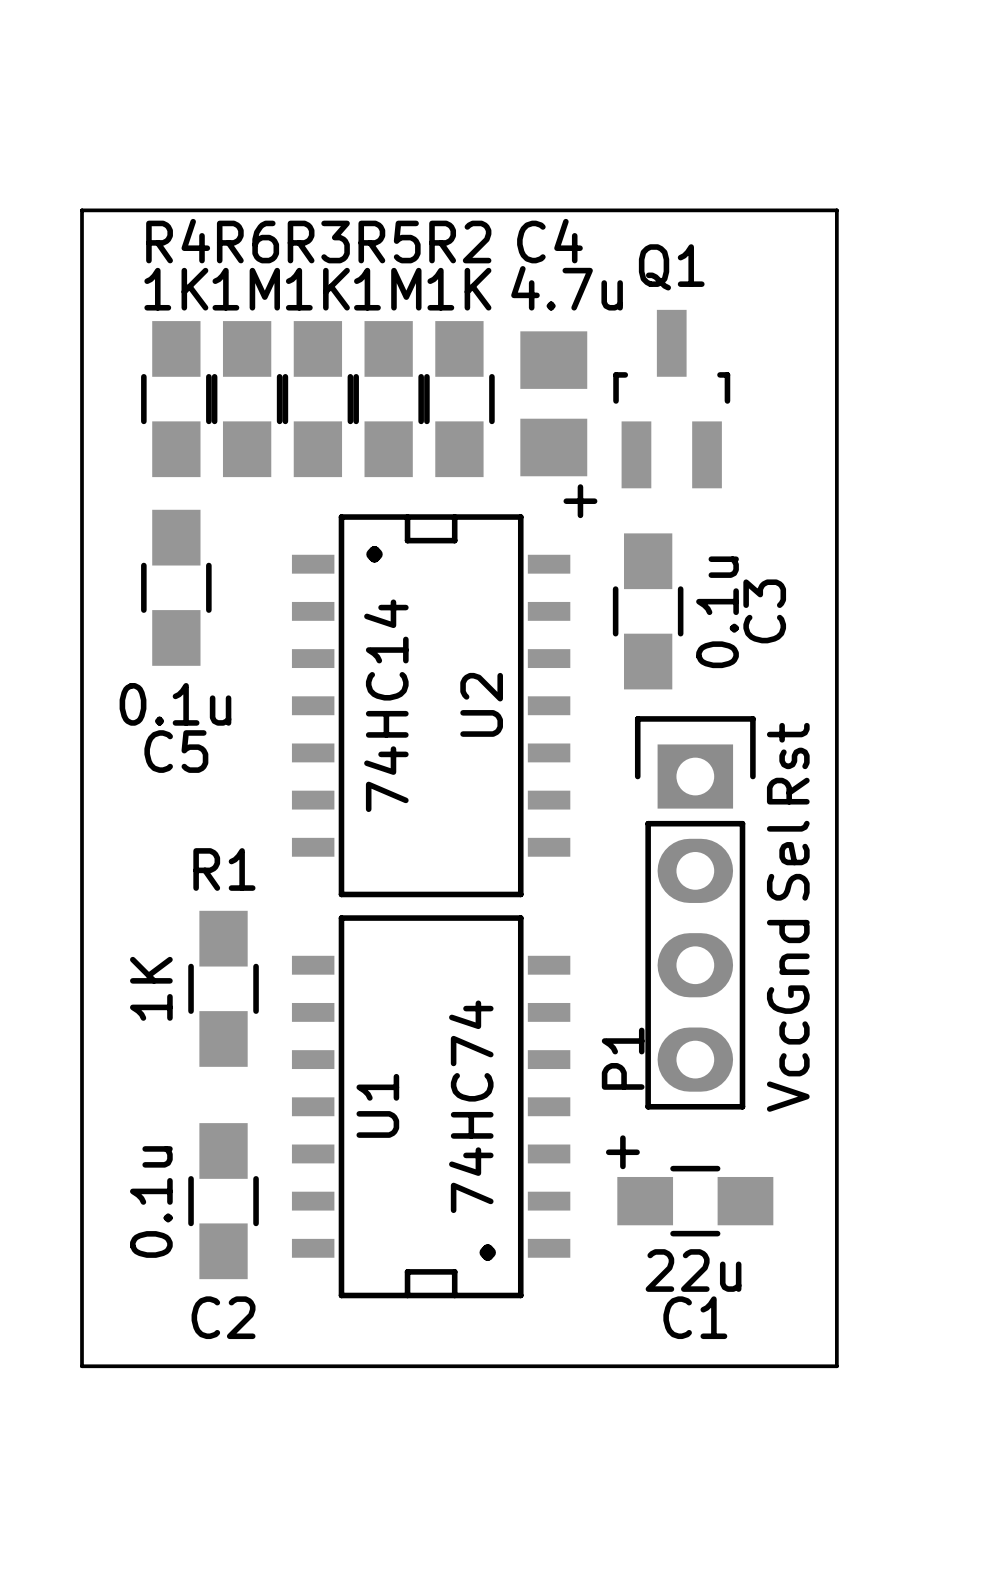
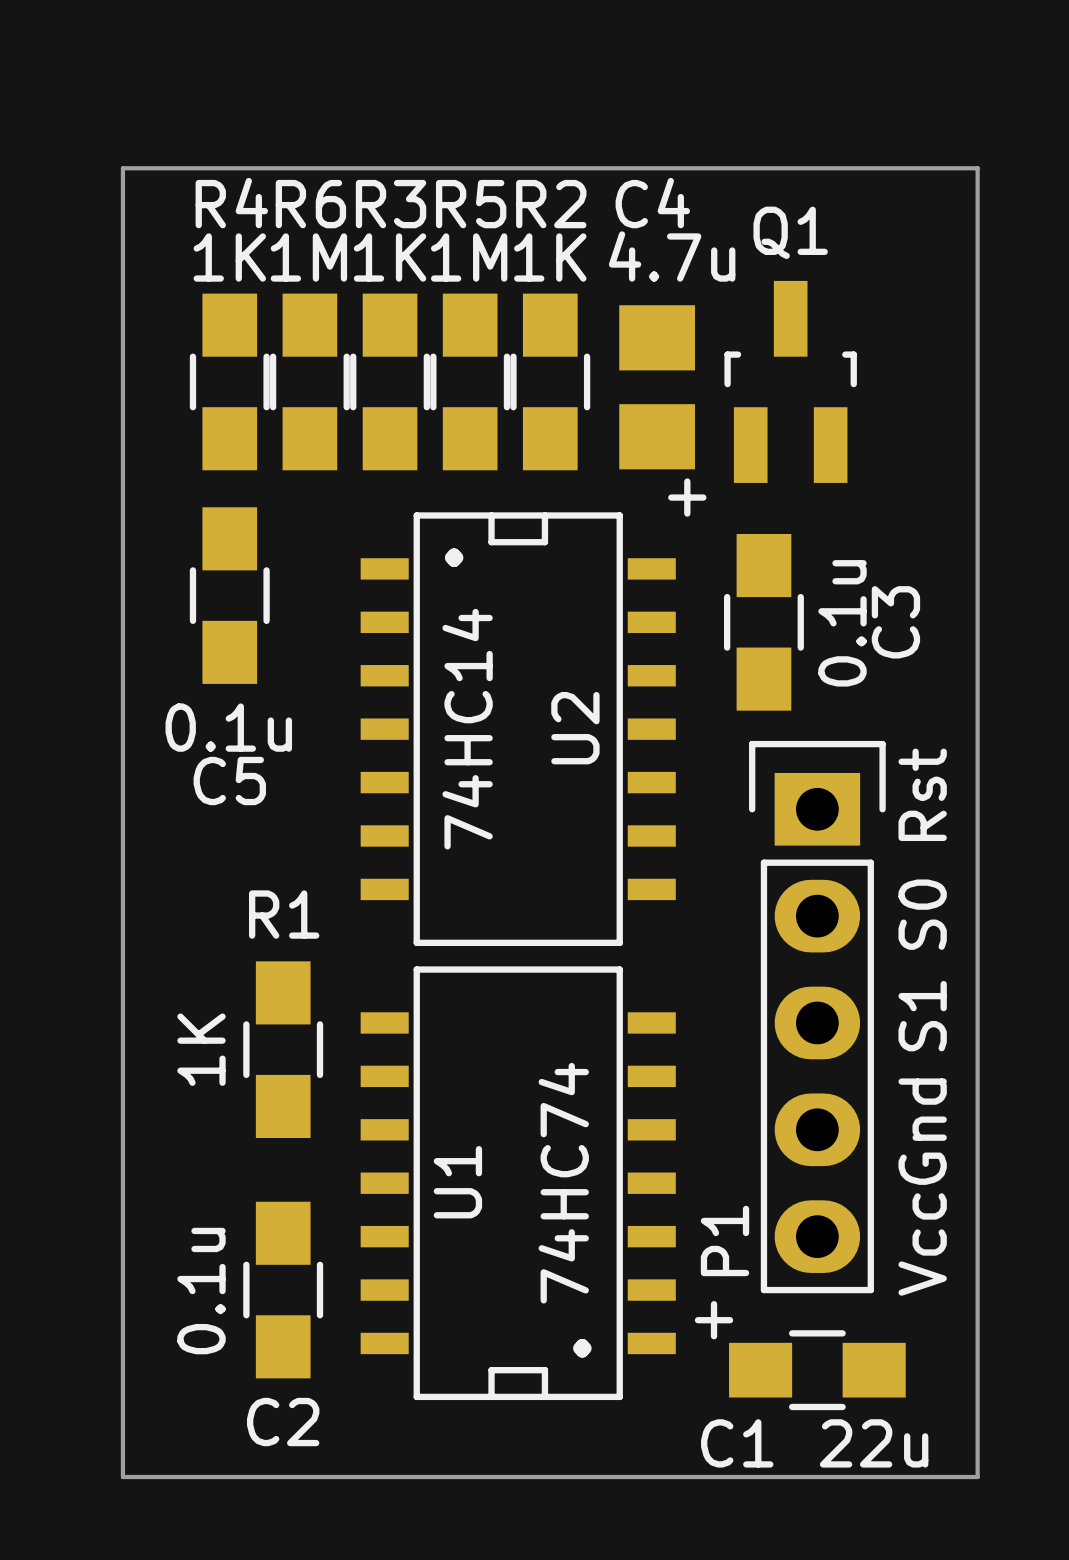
P1 footprint: [634, 716, 756, 1110] -> [749, 740, 886, 1294]
text: Sel (788, 860) -> S0 (922, 914)
text: Gnd (788, 966) -> S1 (922, 1016)
text: Vcc (788, 1066) -> Gnd (922, 1131)
text position: + (622, 1152) -> + (714, 1320)
text: none -> Vcc (922, 1244)
C1 position: (695, 1201) -> (817, 1370)
C1 value position: 22u (693, 1270) -> 22u (874, 1443)
C1 name position: C1 (695, 1317) -> C1 (737, 1443)

